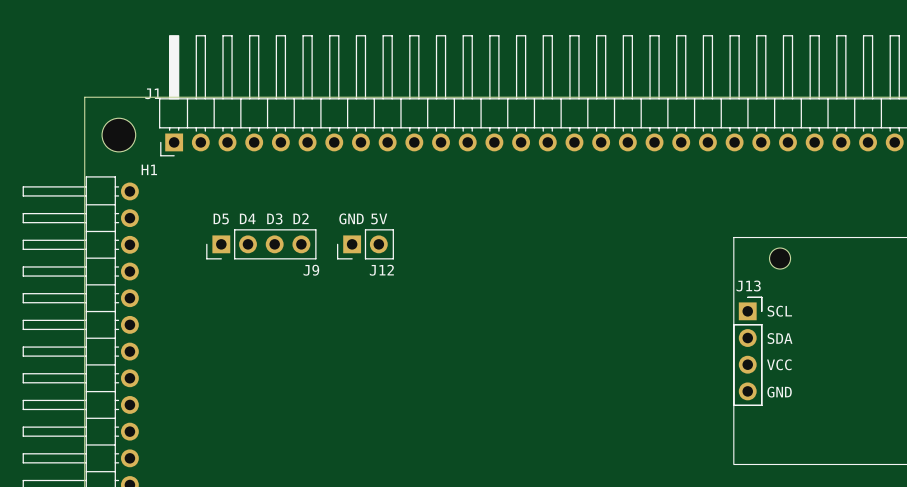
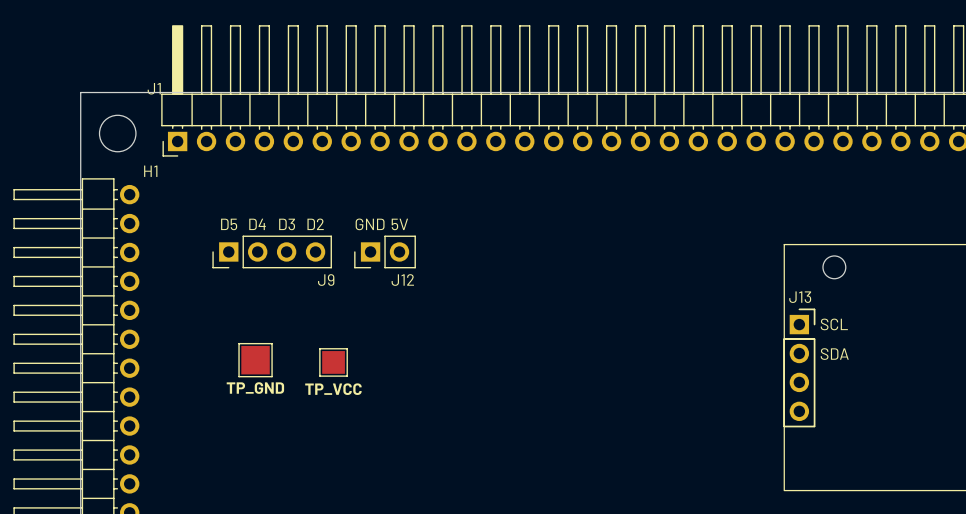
part: none -> (255, 360)
part: none -> (333, 362)
text: VCC (779, 364) -> none
text: none -> TP_GND (255, 388)
text: none -> TP_VCC (333, 389)
text: GND (779, 392) -> none

